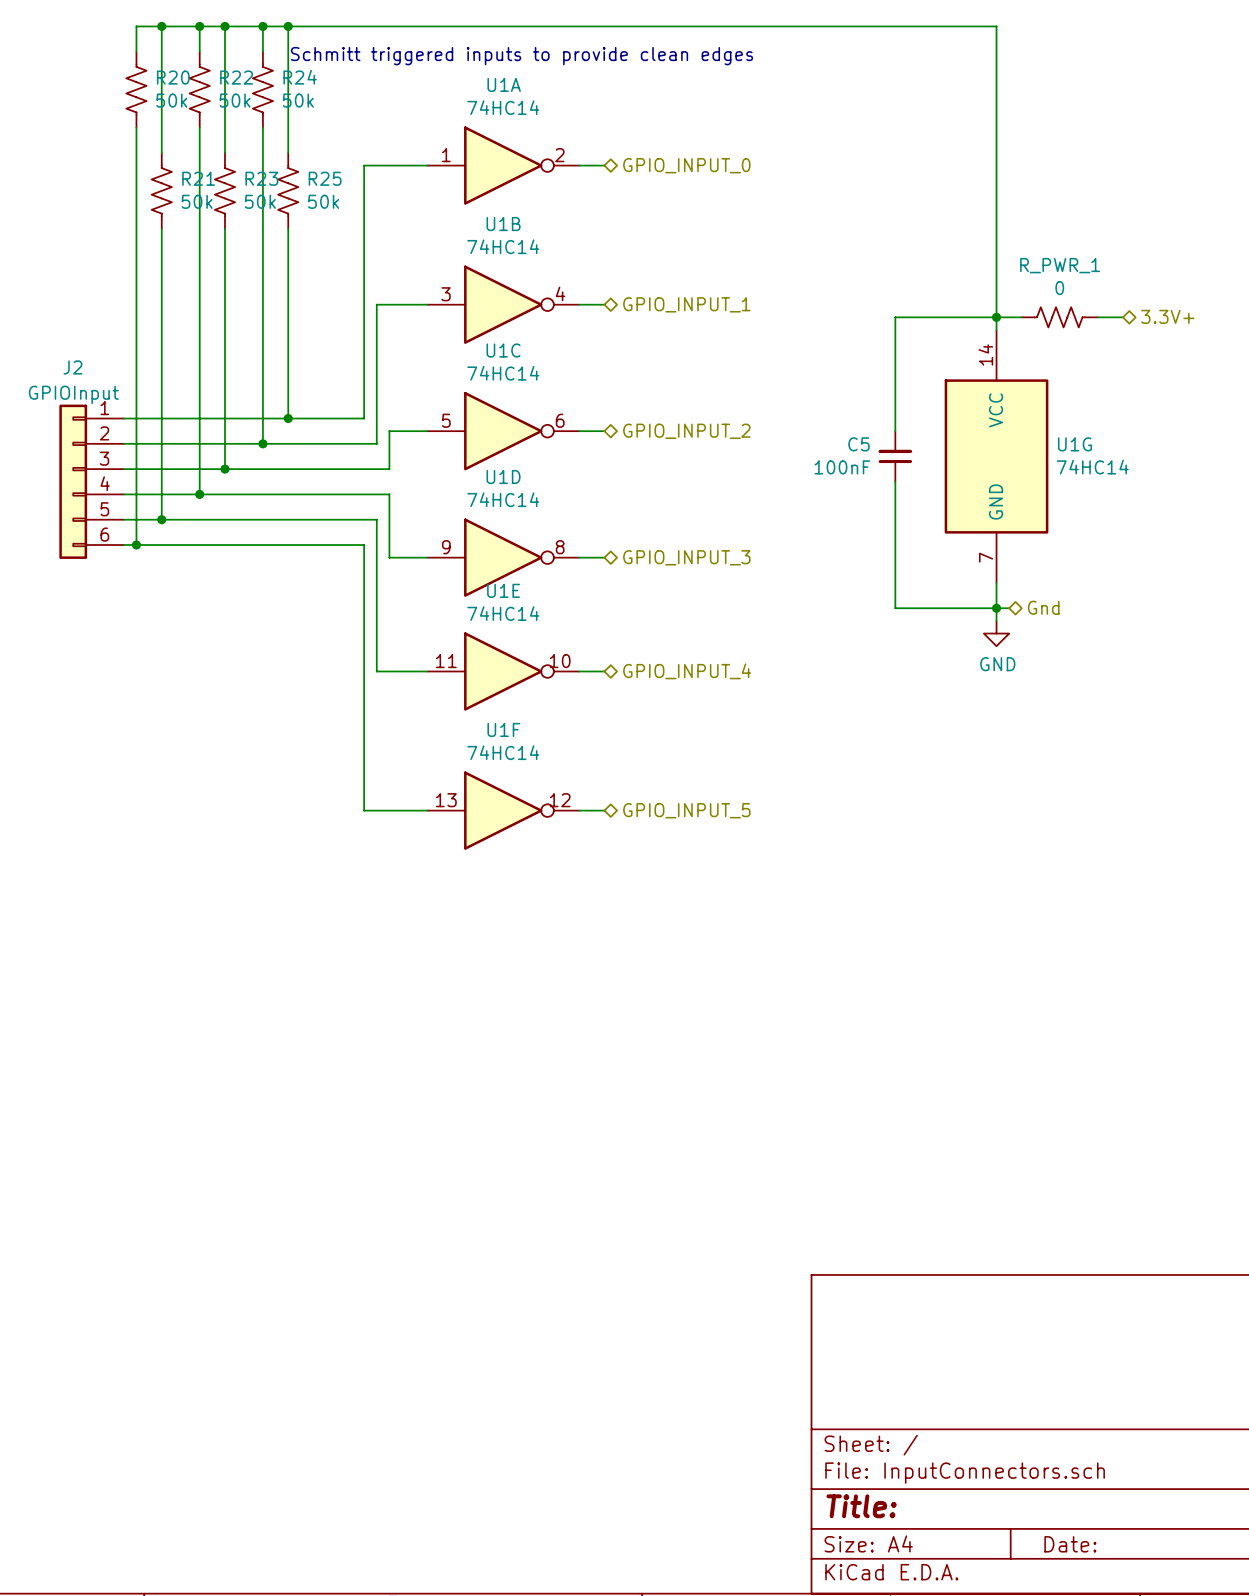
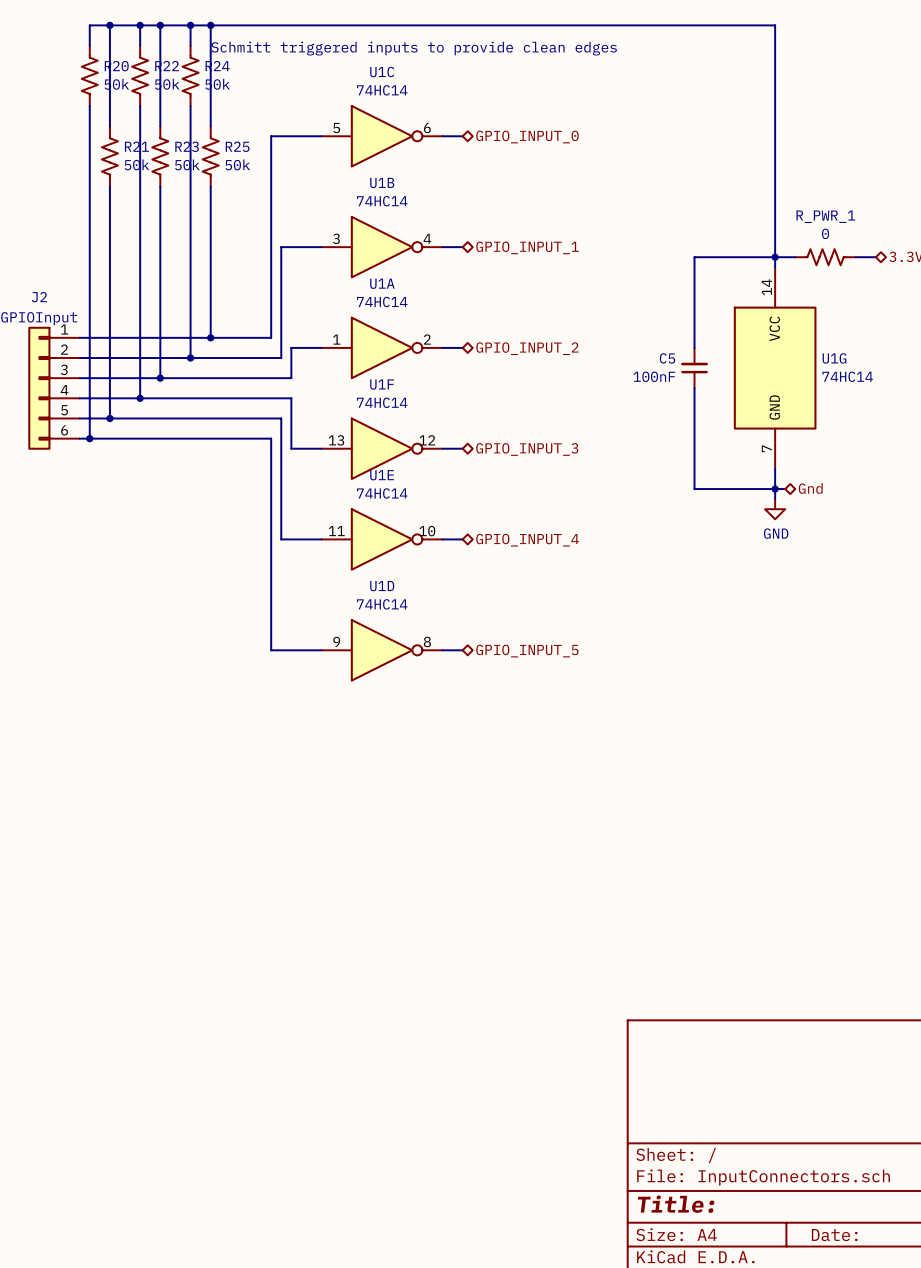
U1A position: (503, 165) -> (382, 347)
U1C position: (503, 431) -> (382, 136)
U1D position: (503, 557) -> (382, 650)
U1F position: (503, 810) -> (382, 448)

